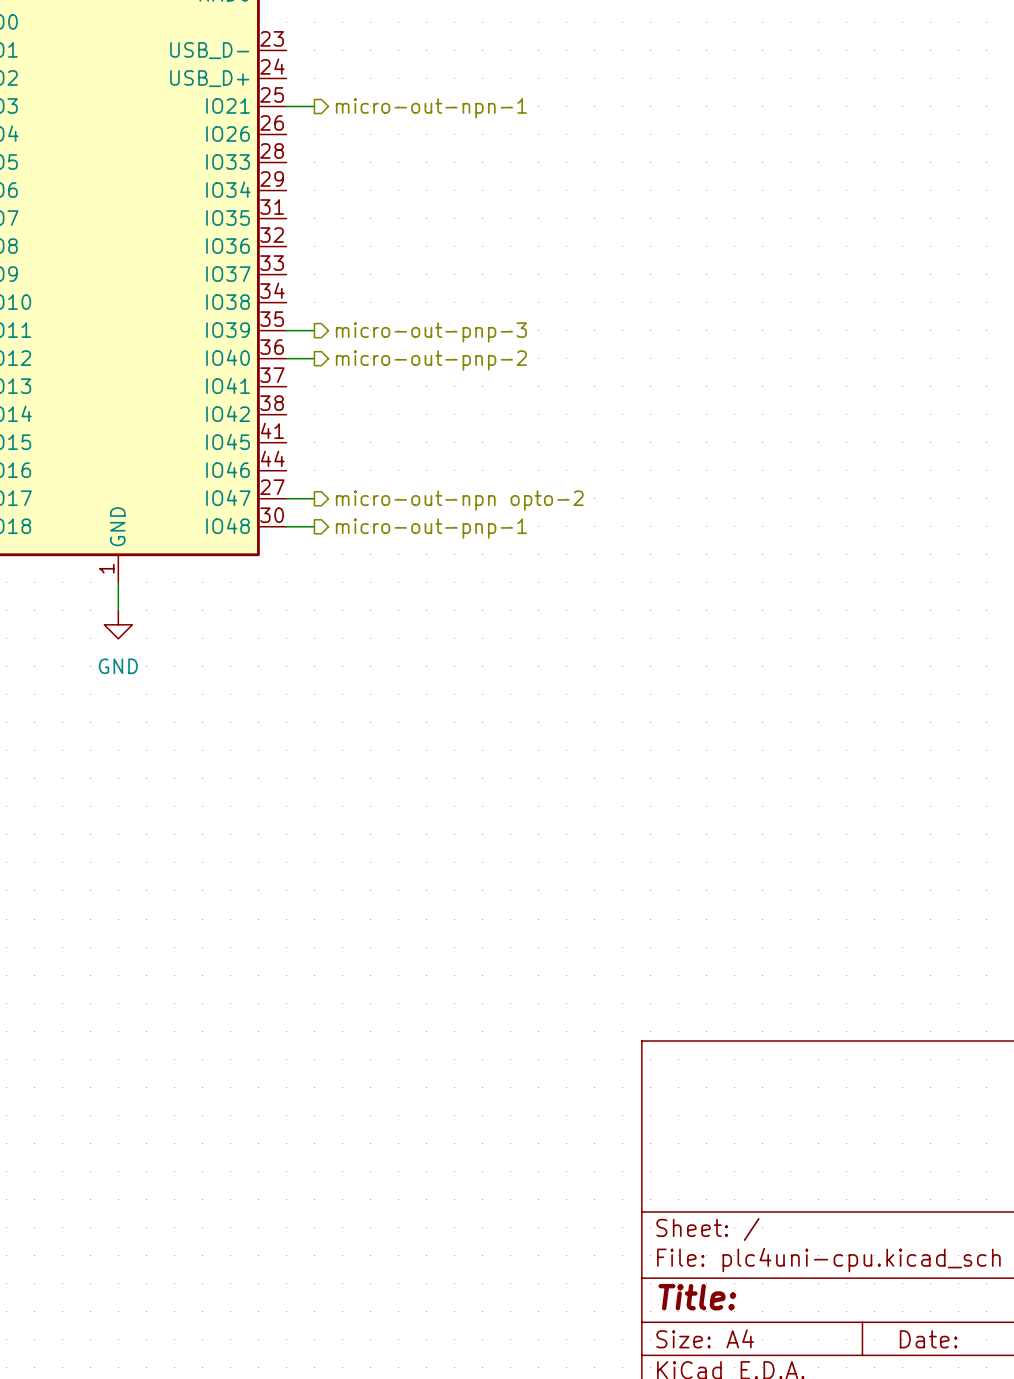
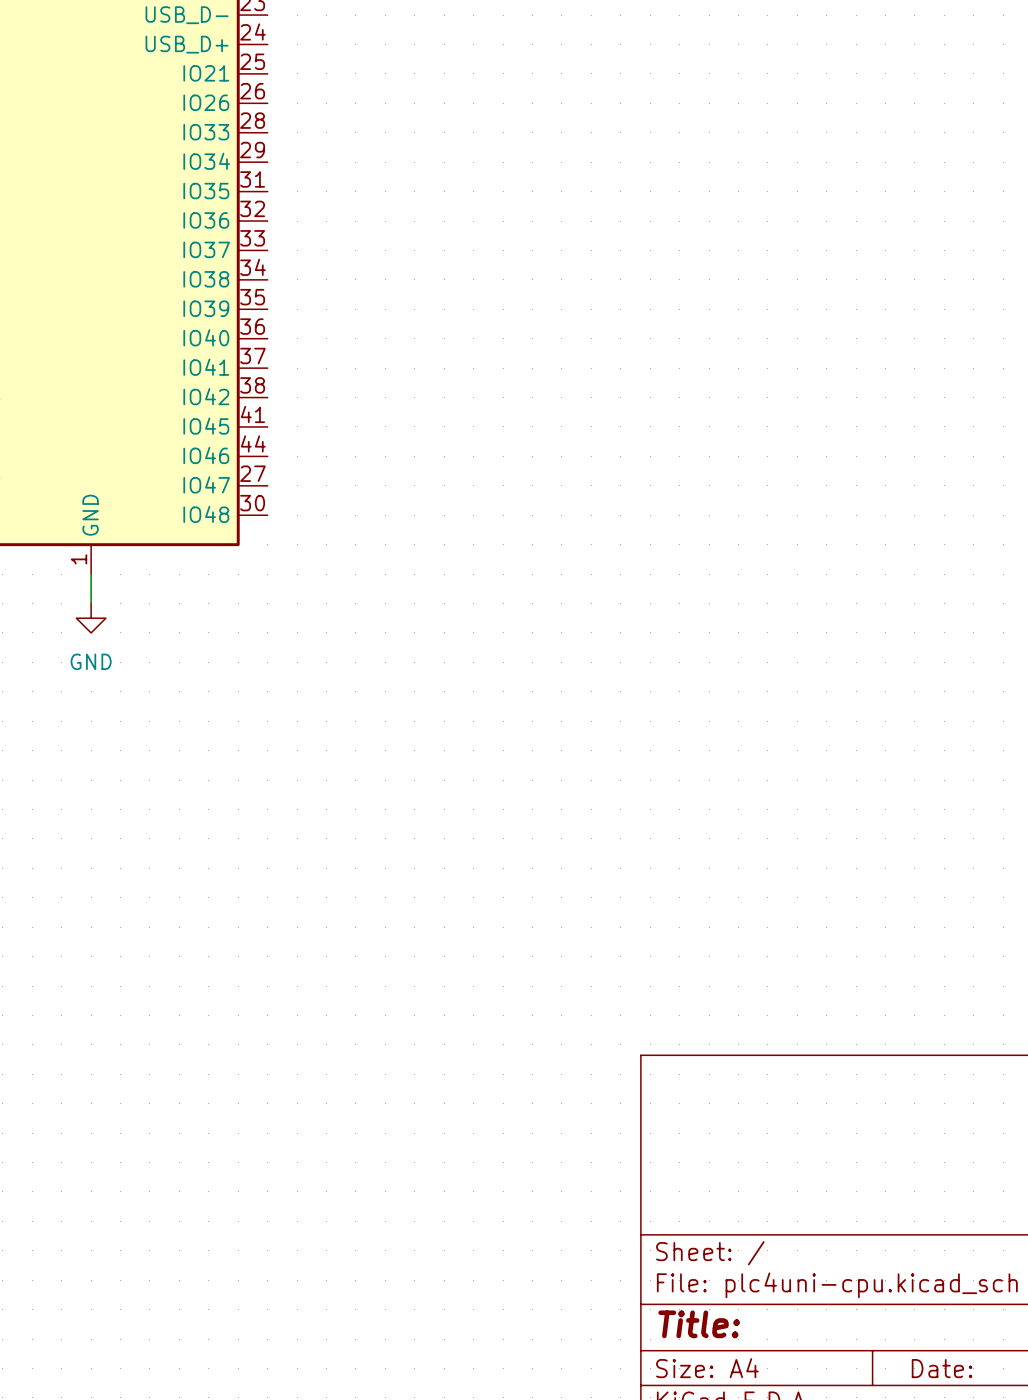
wire: (286, 106) (314, 106) -> none
hierarchical label: micro-out-npn-1 (431, 108) -> none
wire: (286, 330) (314, 330) -> none
hierarchical label: micro-out-pnp-3 (431, 332) -> none
wire: (286, 358) (314, 358) -> none
hierarchical label: micro-out-pnp-2 (431, 360) -> none
wire: (286, 498) (314, 498) -> none
hierarchical label: micro-out-npn opto-2 (459, 500) -> none
wire: (286, 526) (314, 526) -> none
hierarchical label: micro-out-pnp-1 (431, 528) -> none

